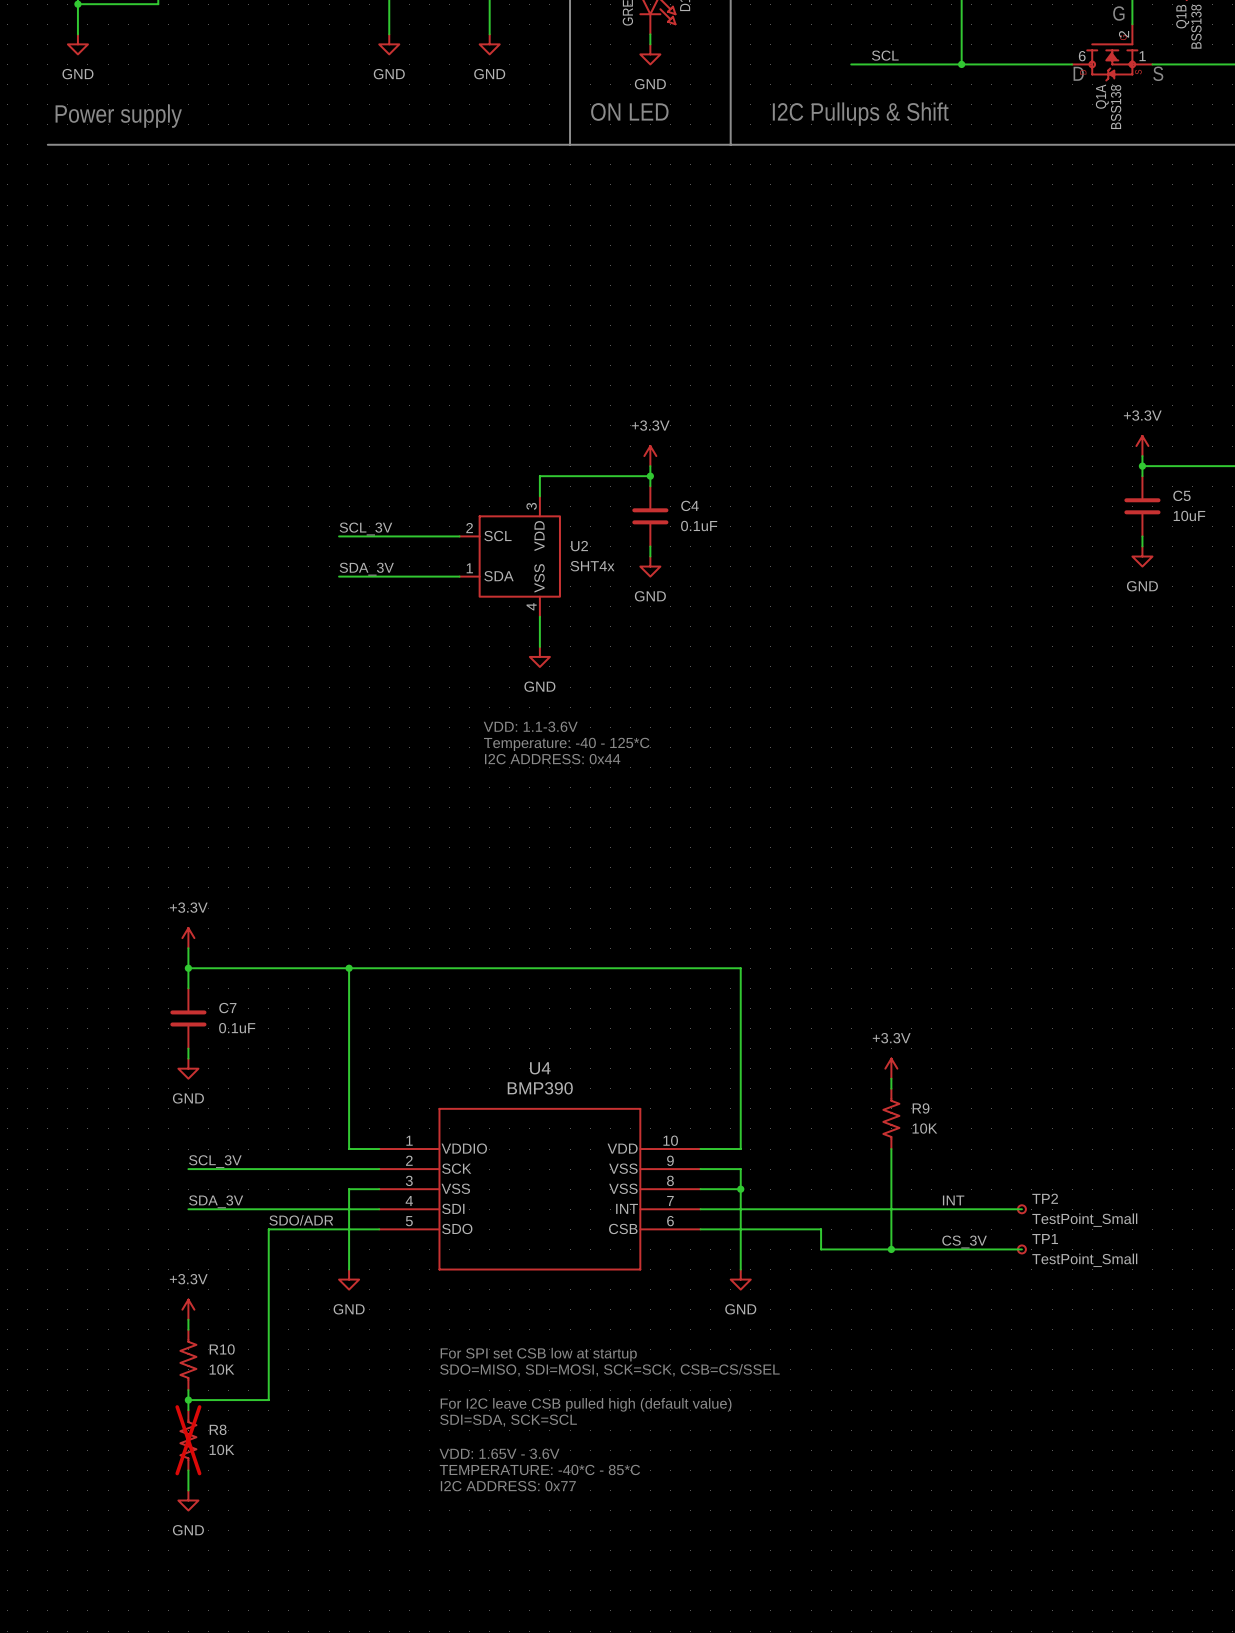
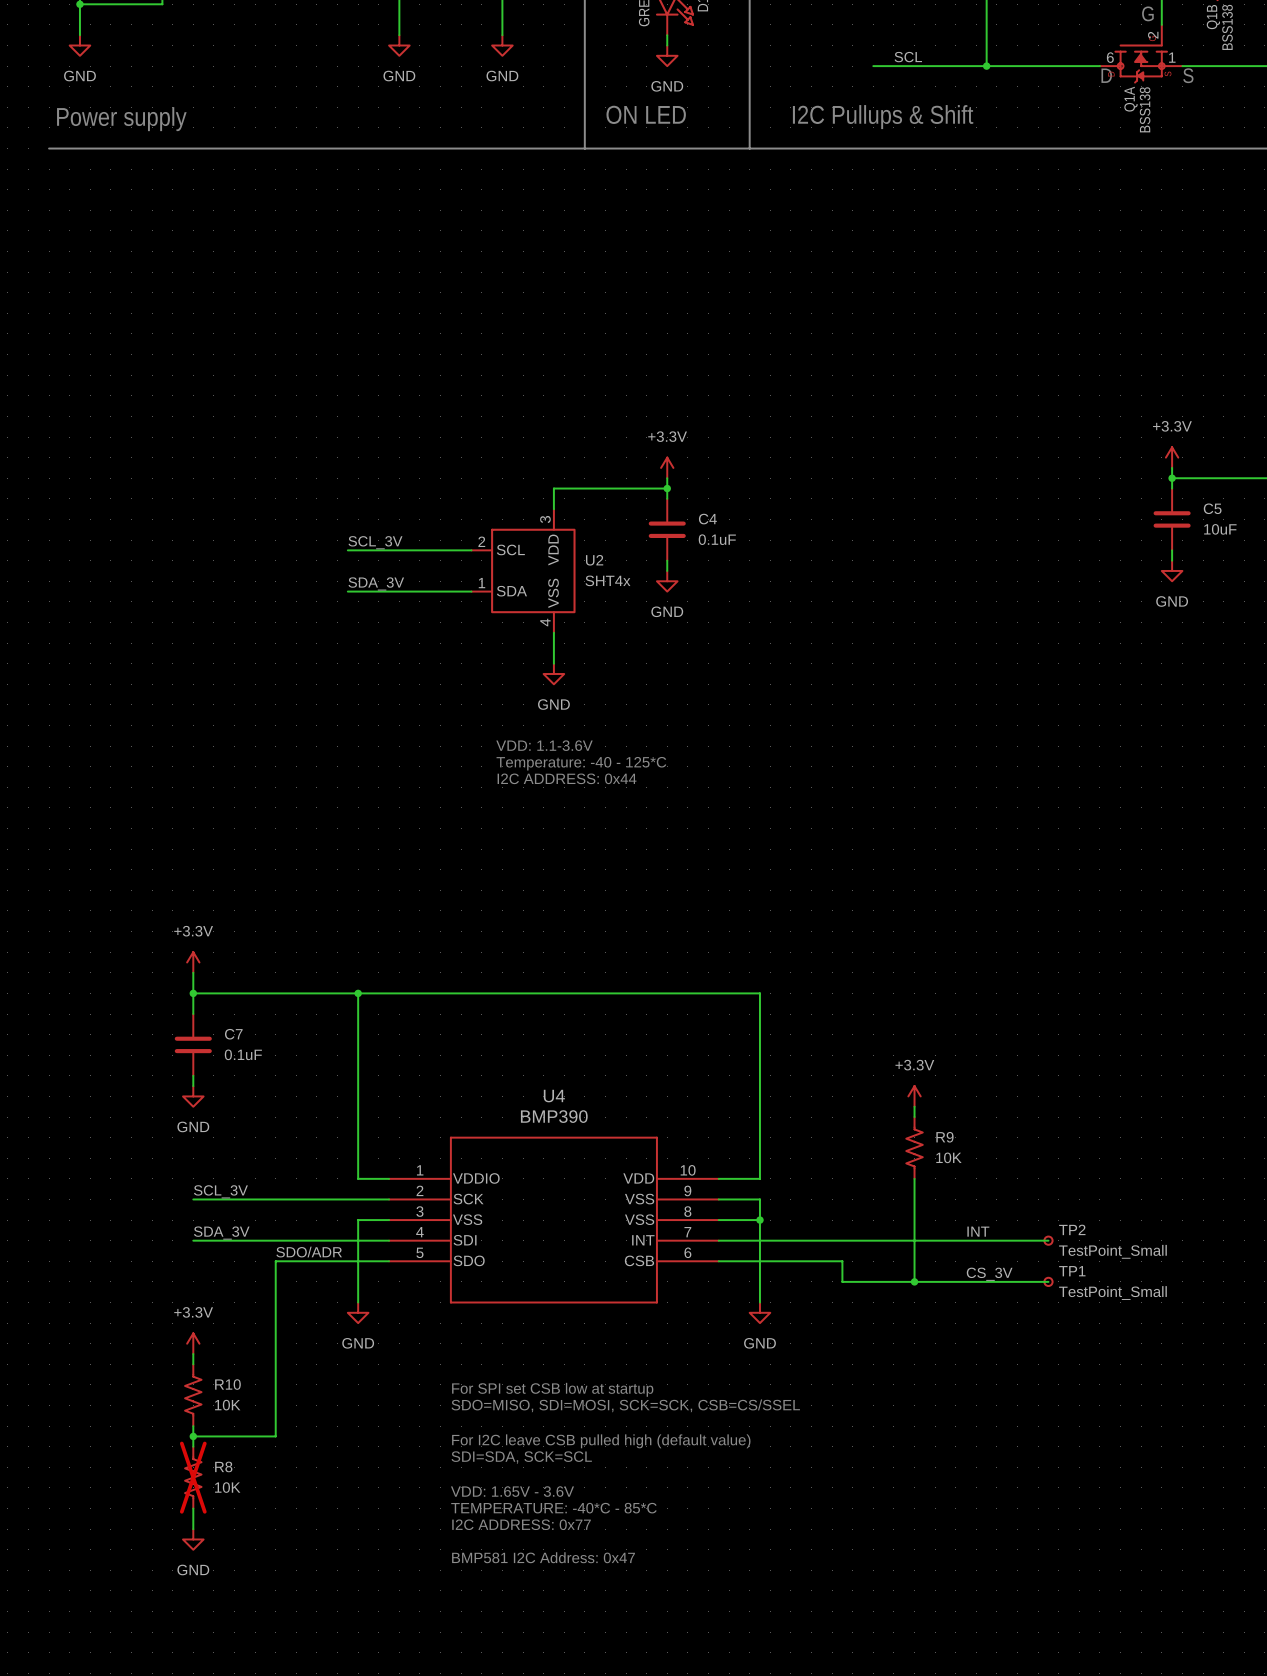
text: none -> BMP581 I2C Address: 0x47 (543, 1557)

